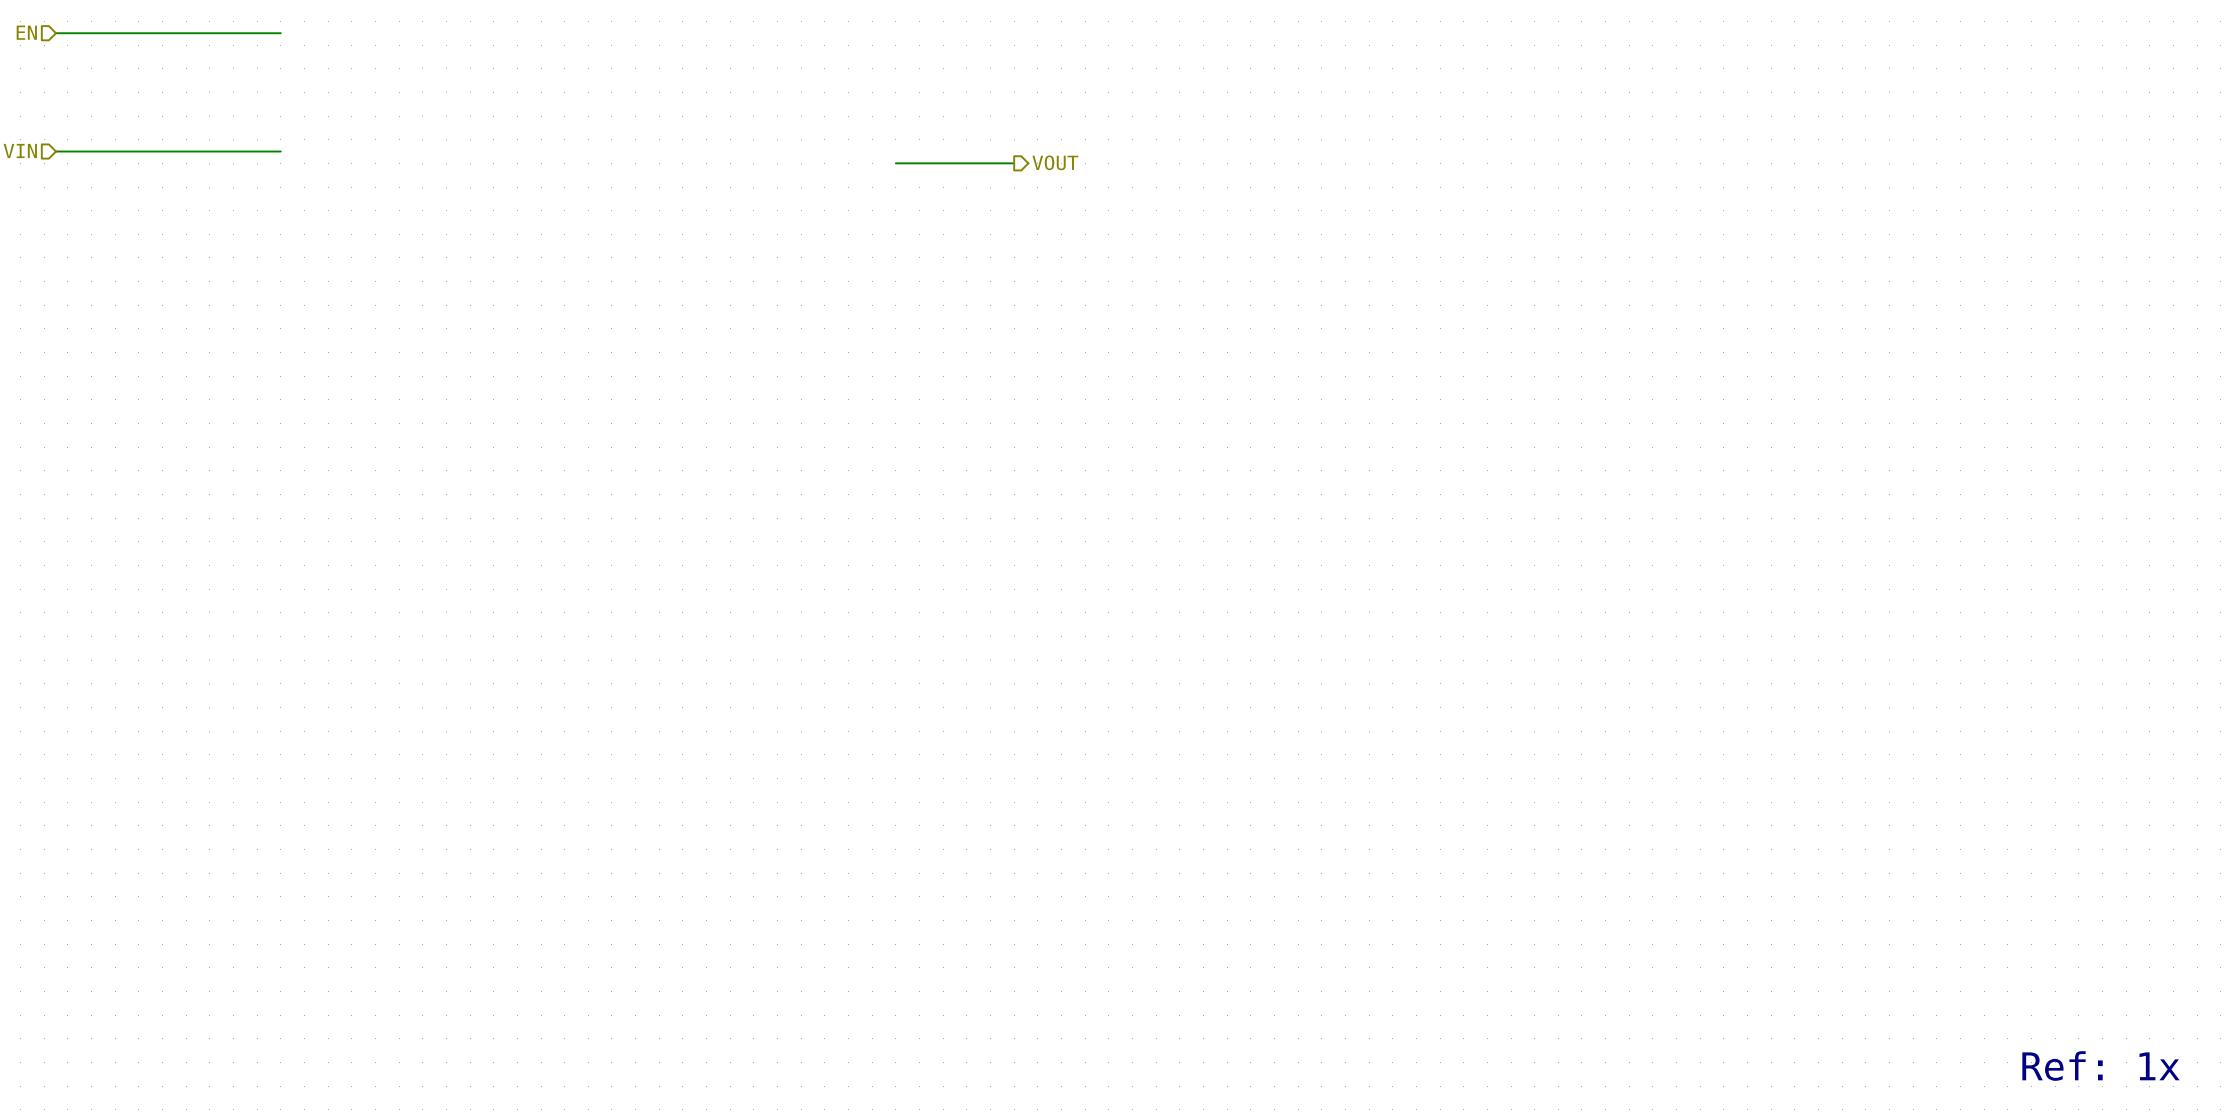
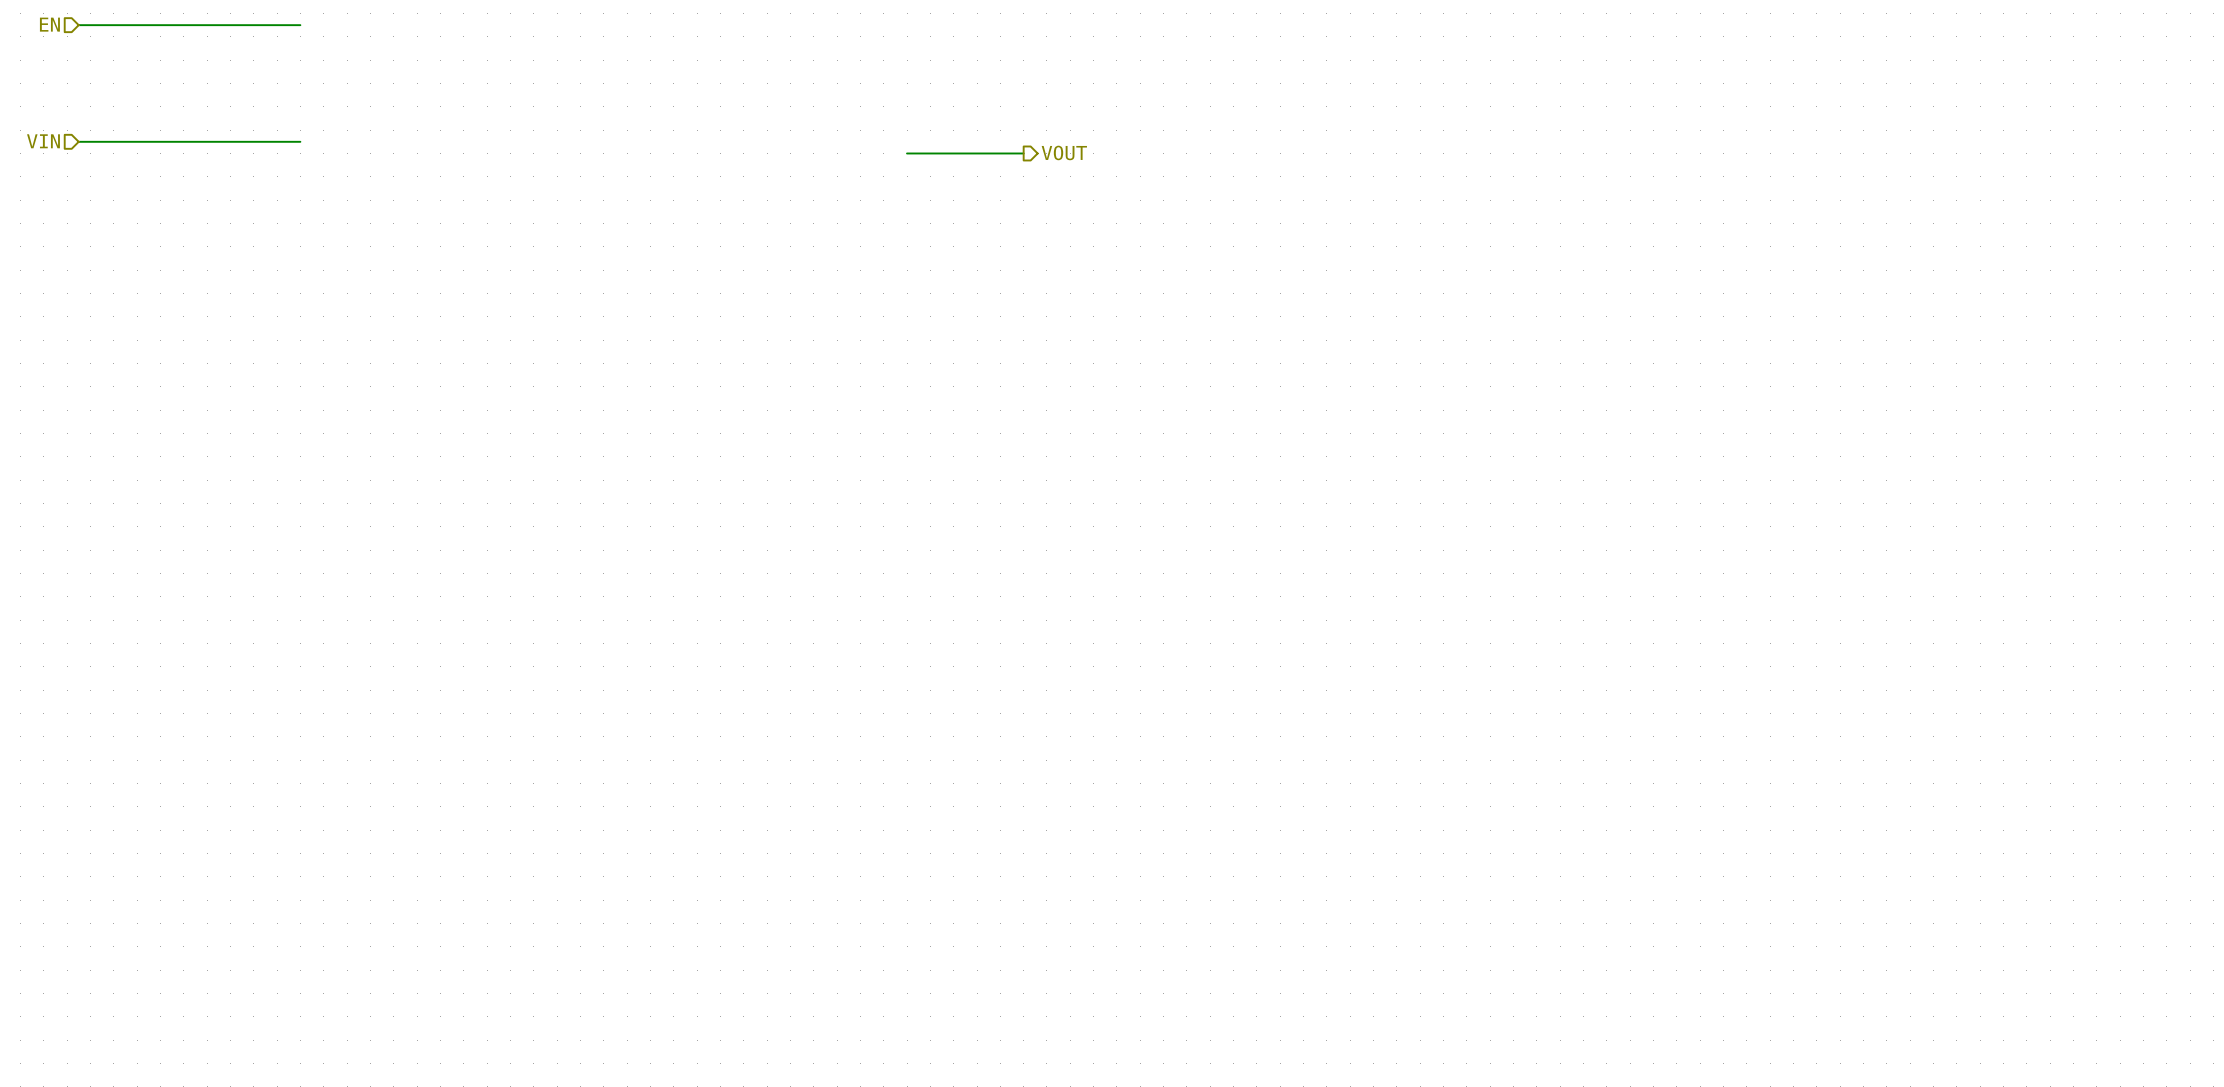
text: Ref: 1x (2100, 1066) -> none

